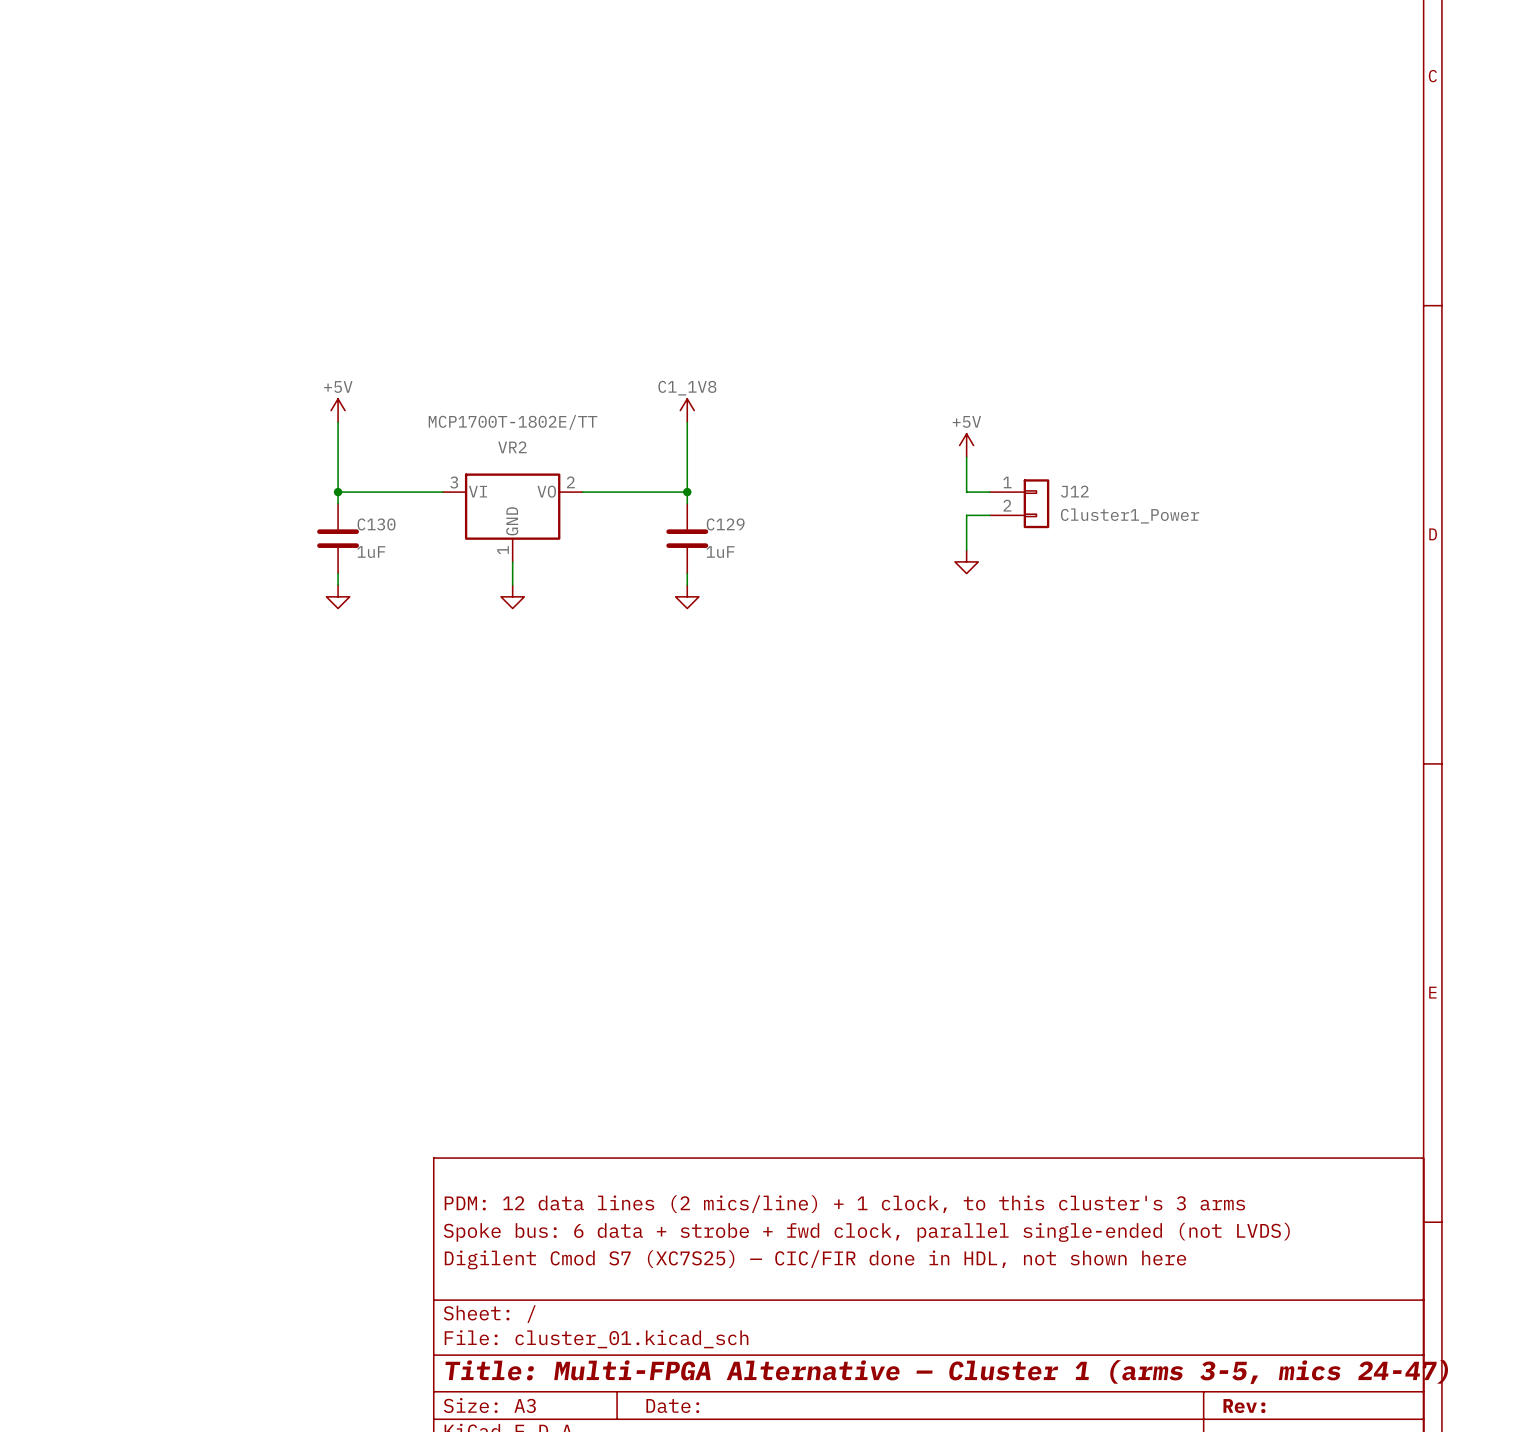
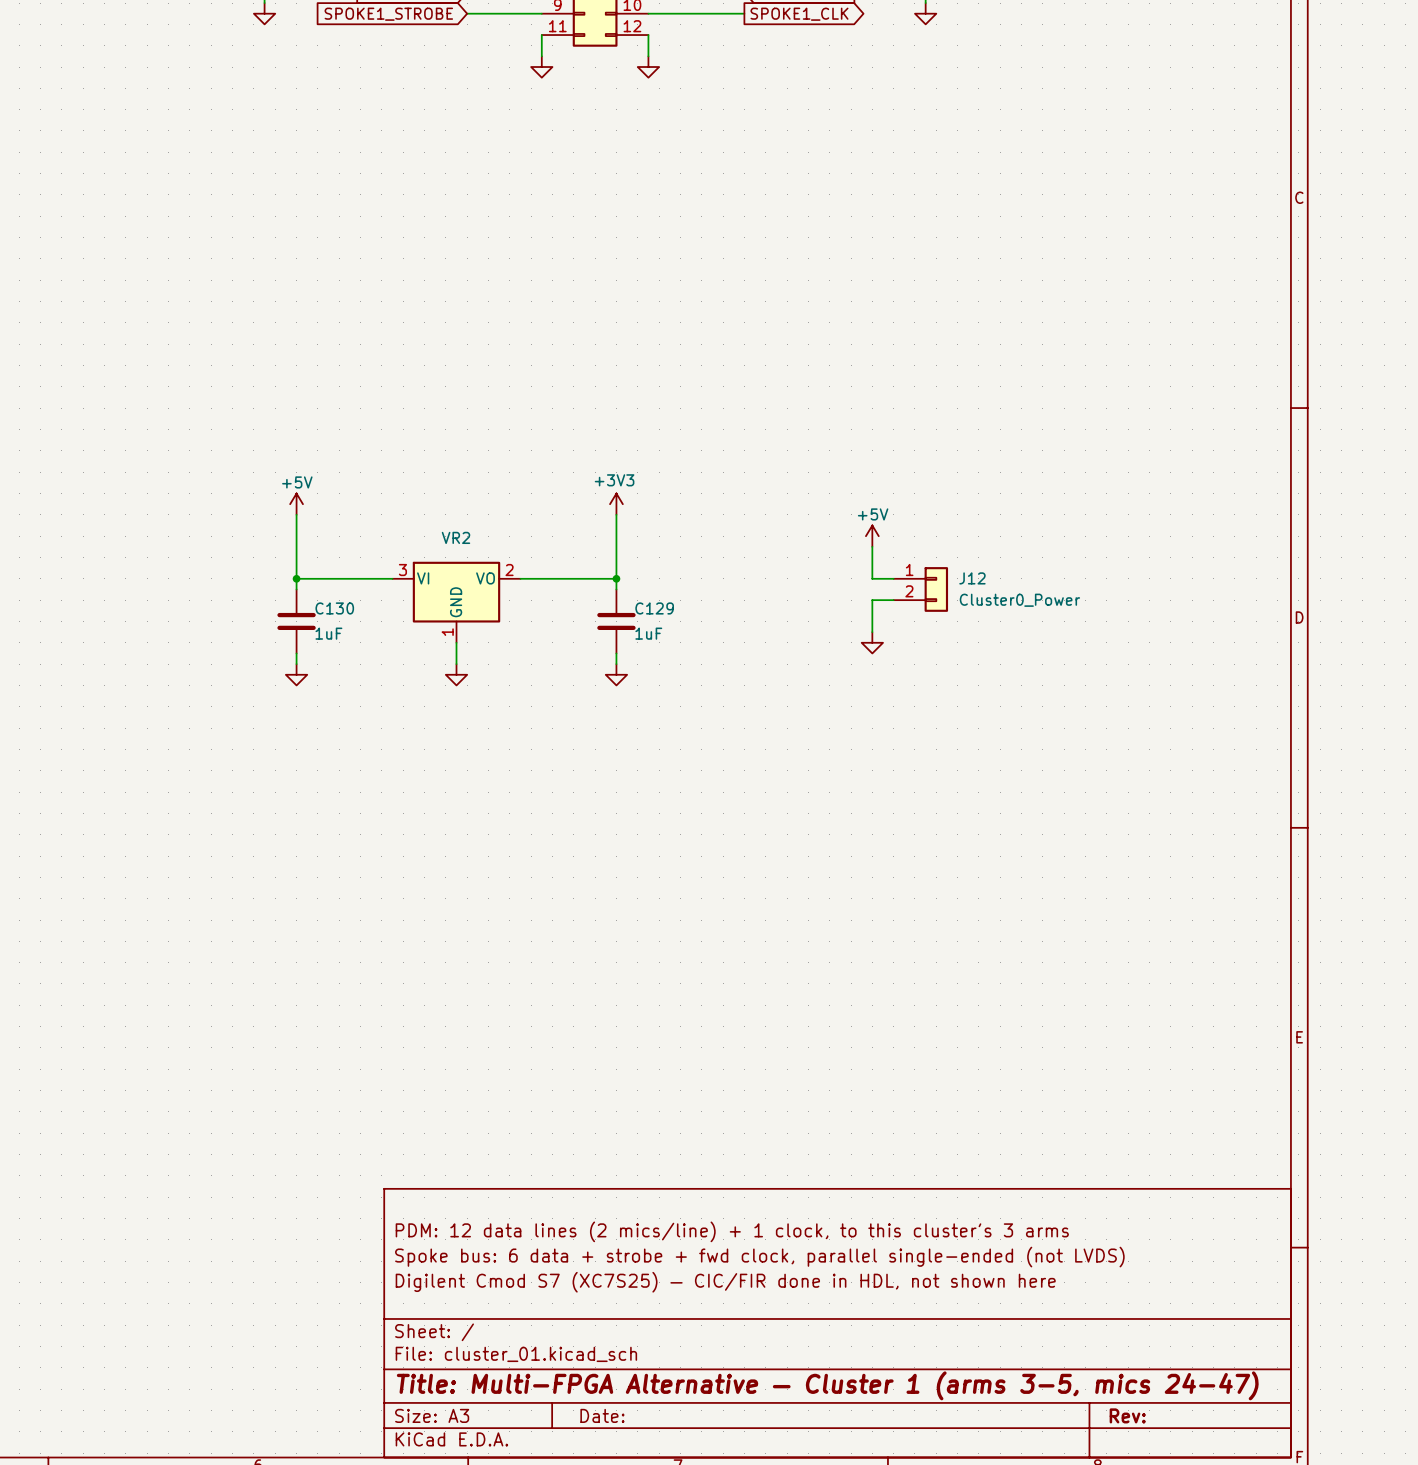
power symbol: C1_1V8 (687, 410) -> +3V3 (616, 504)
VR2 value: MCP1700T-1802E/TT (513, 422) -> none
J12 value: Cluster1_Power (1130, 515) -> Cluster0_Power (1019, 600)

